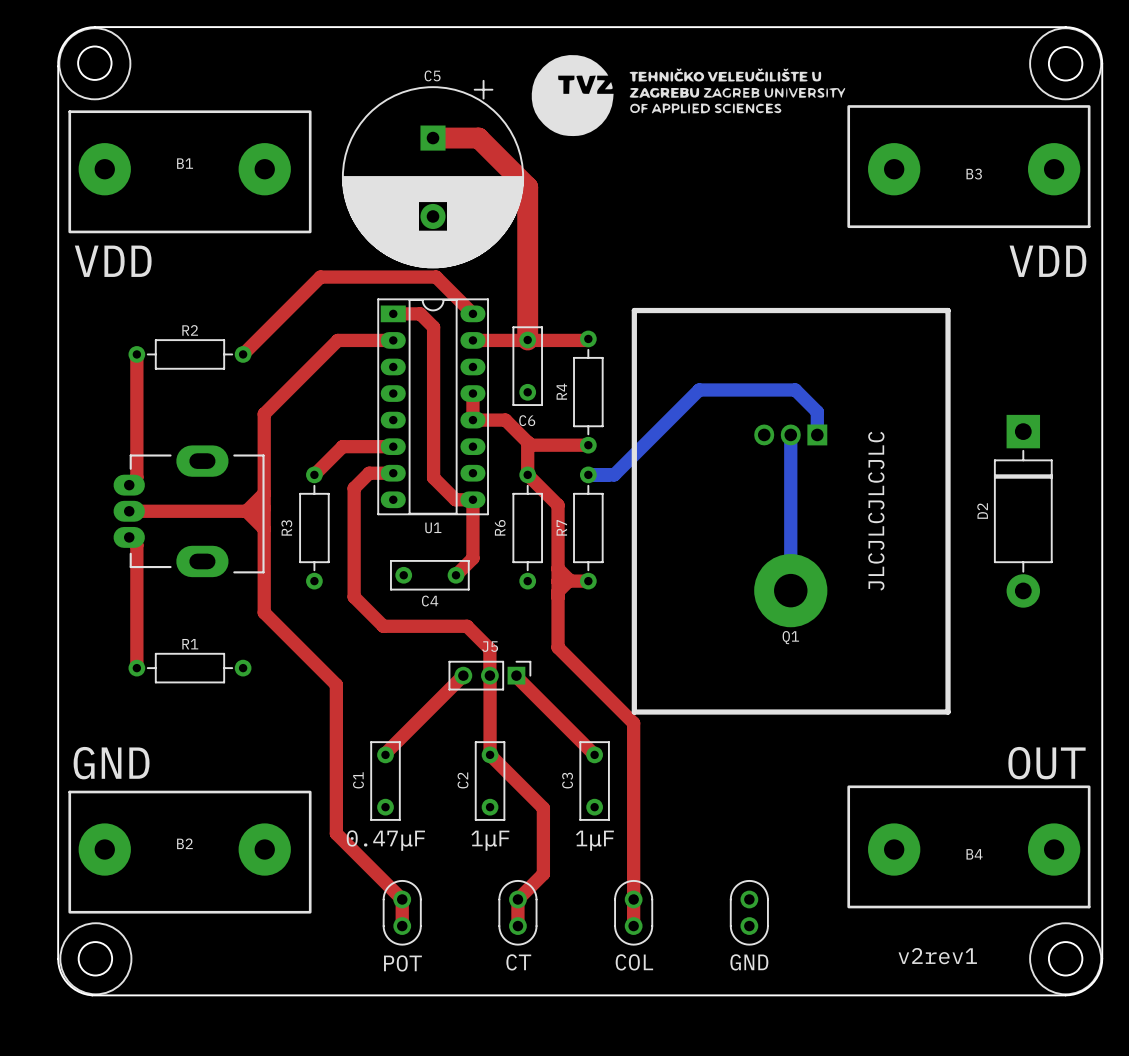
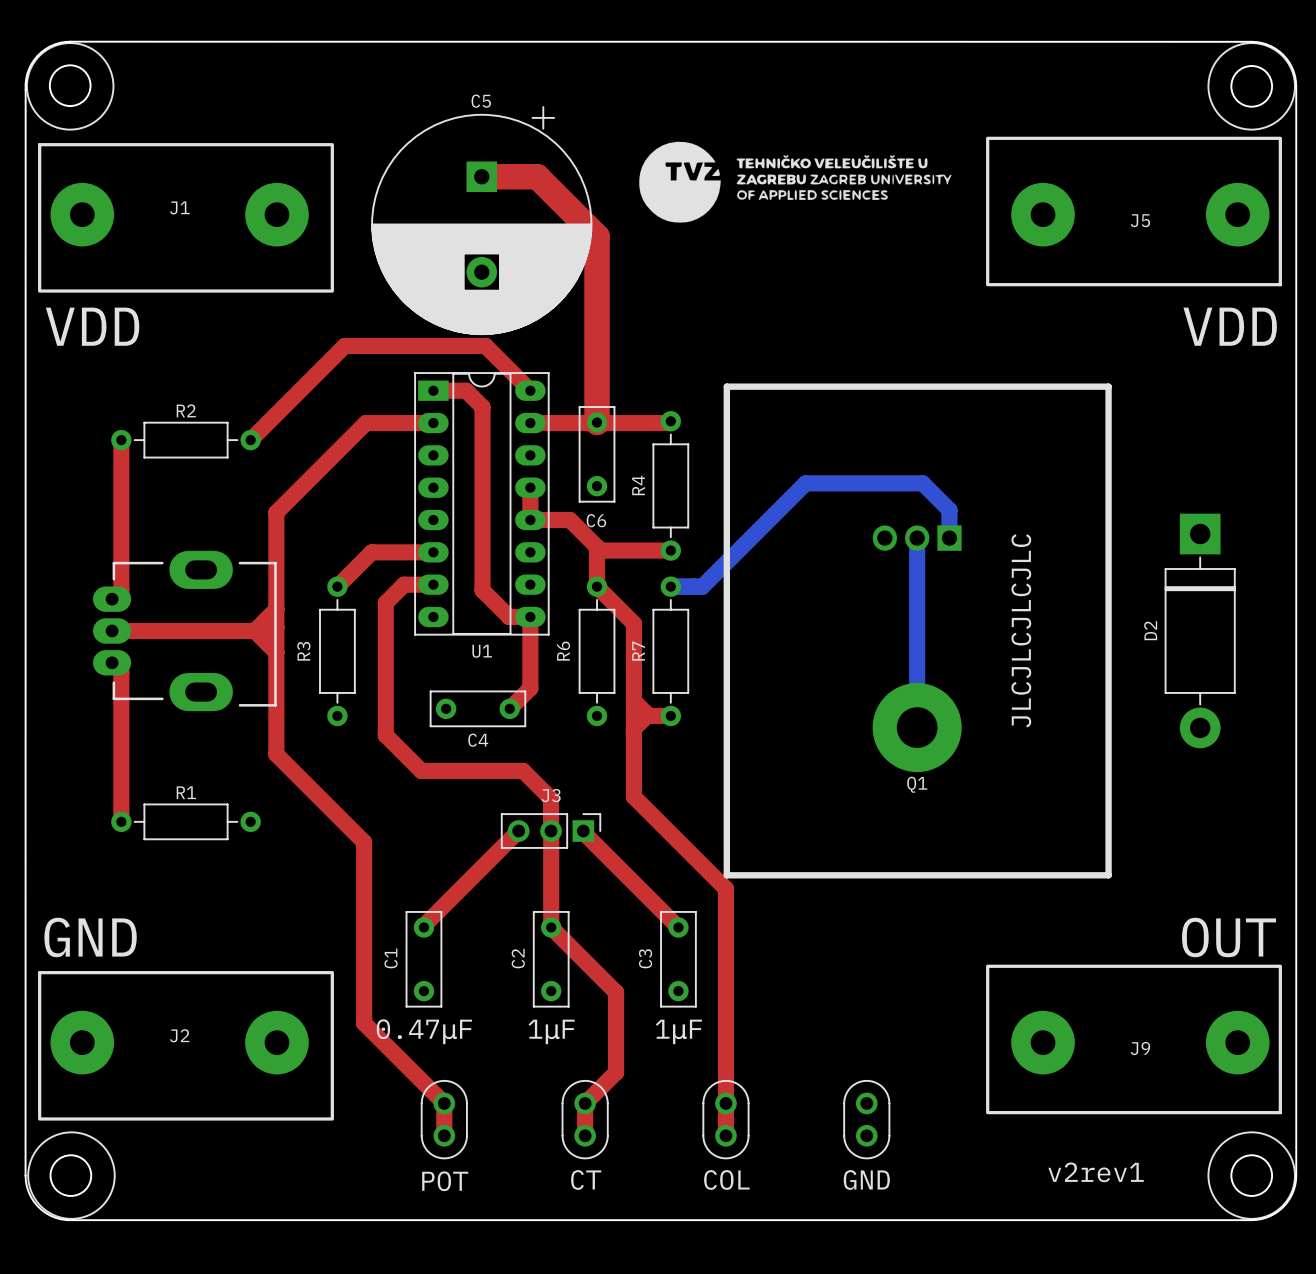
drawing: [531, 55, 846, 137] -> none
drawing: none -> [639, 141, 952, 223]
B1 name: B1 (185, 163) -> J1 (179, 207)
B3 name: B3 (974, 174) -> J5 (1140, 220)
J5 name: J5 (490, 646) -> J3 (551, 795)
B2 name: B2 (184, 843) -> J2 (179, 1035)
B4 name: B4 (974, 854) -> J9 (1140, 1048)

